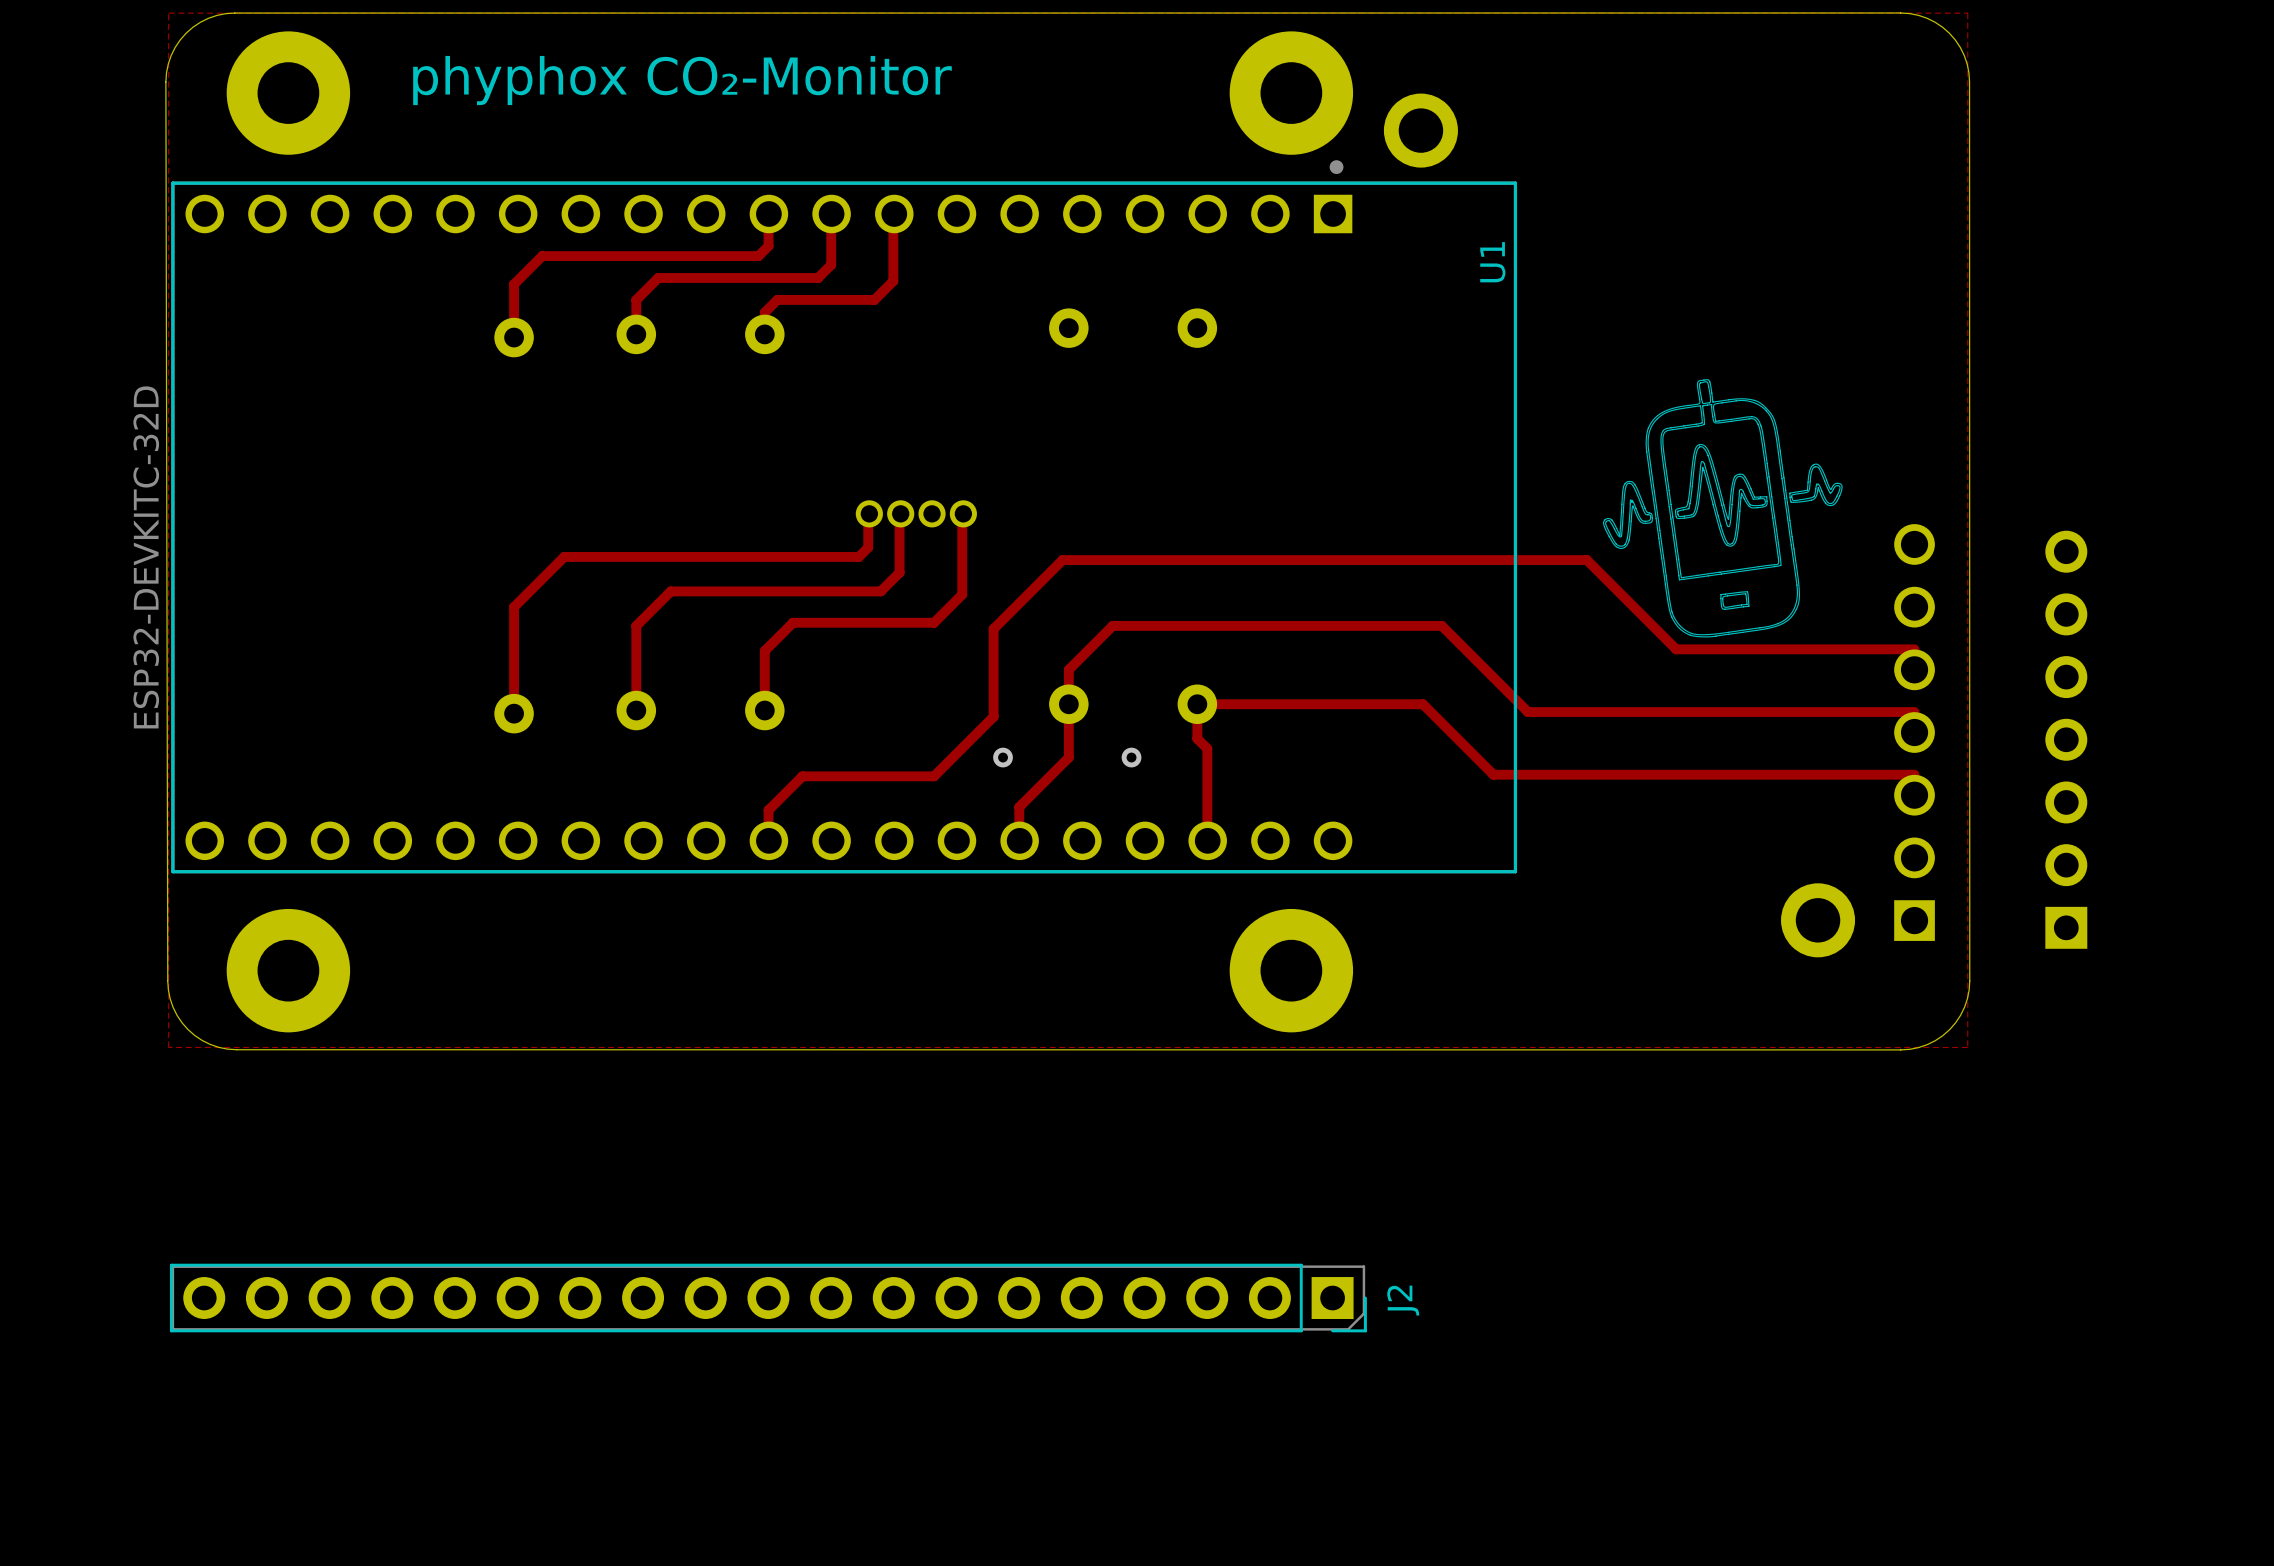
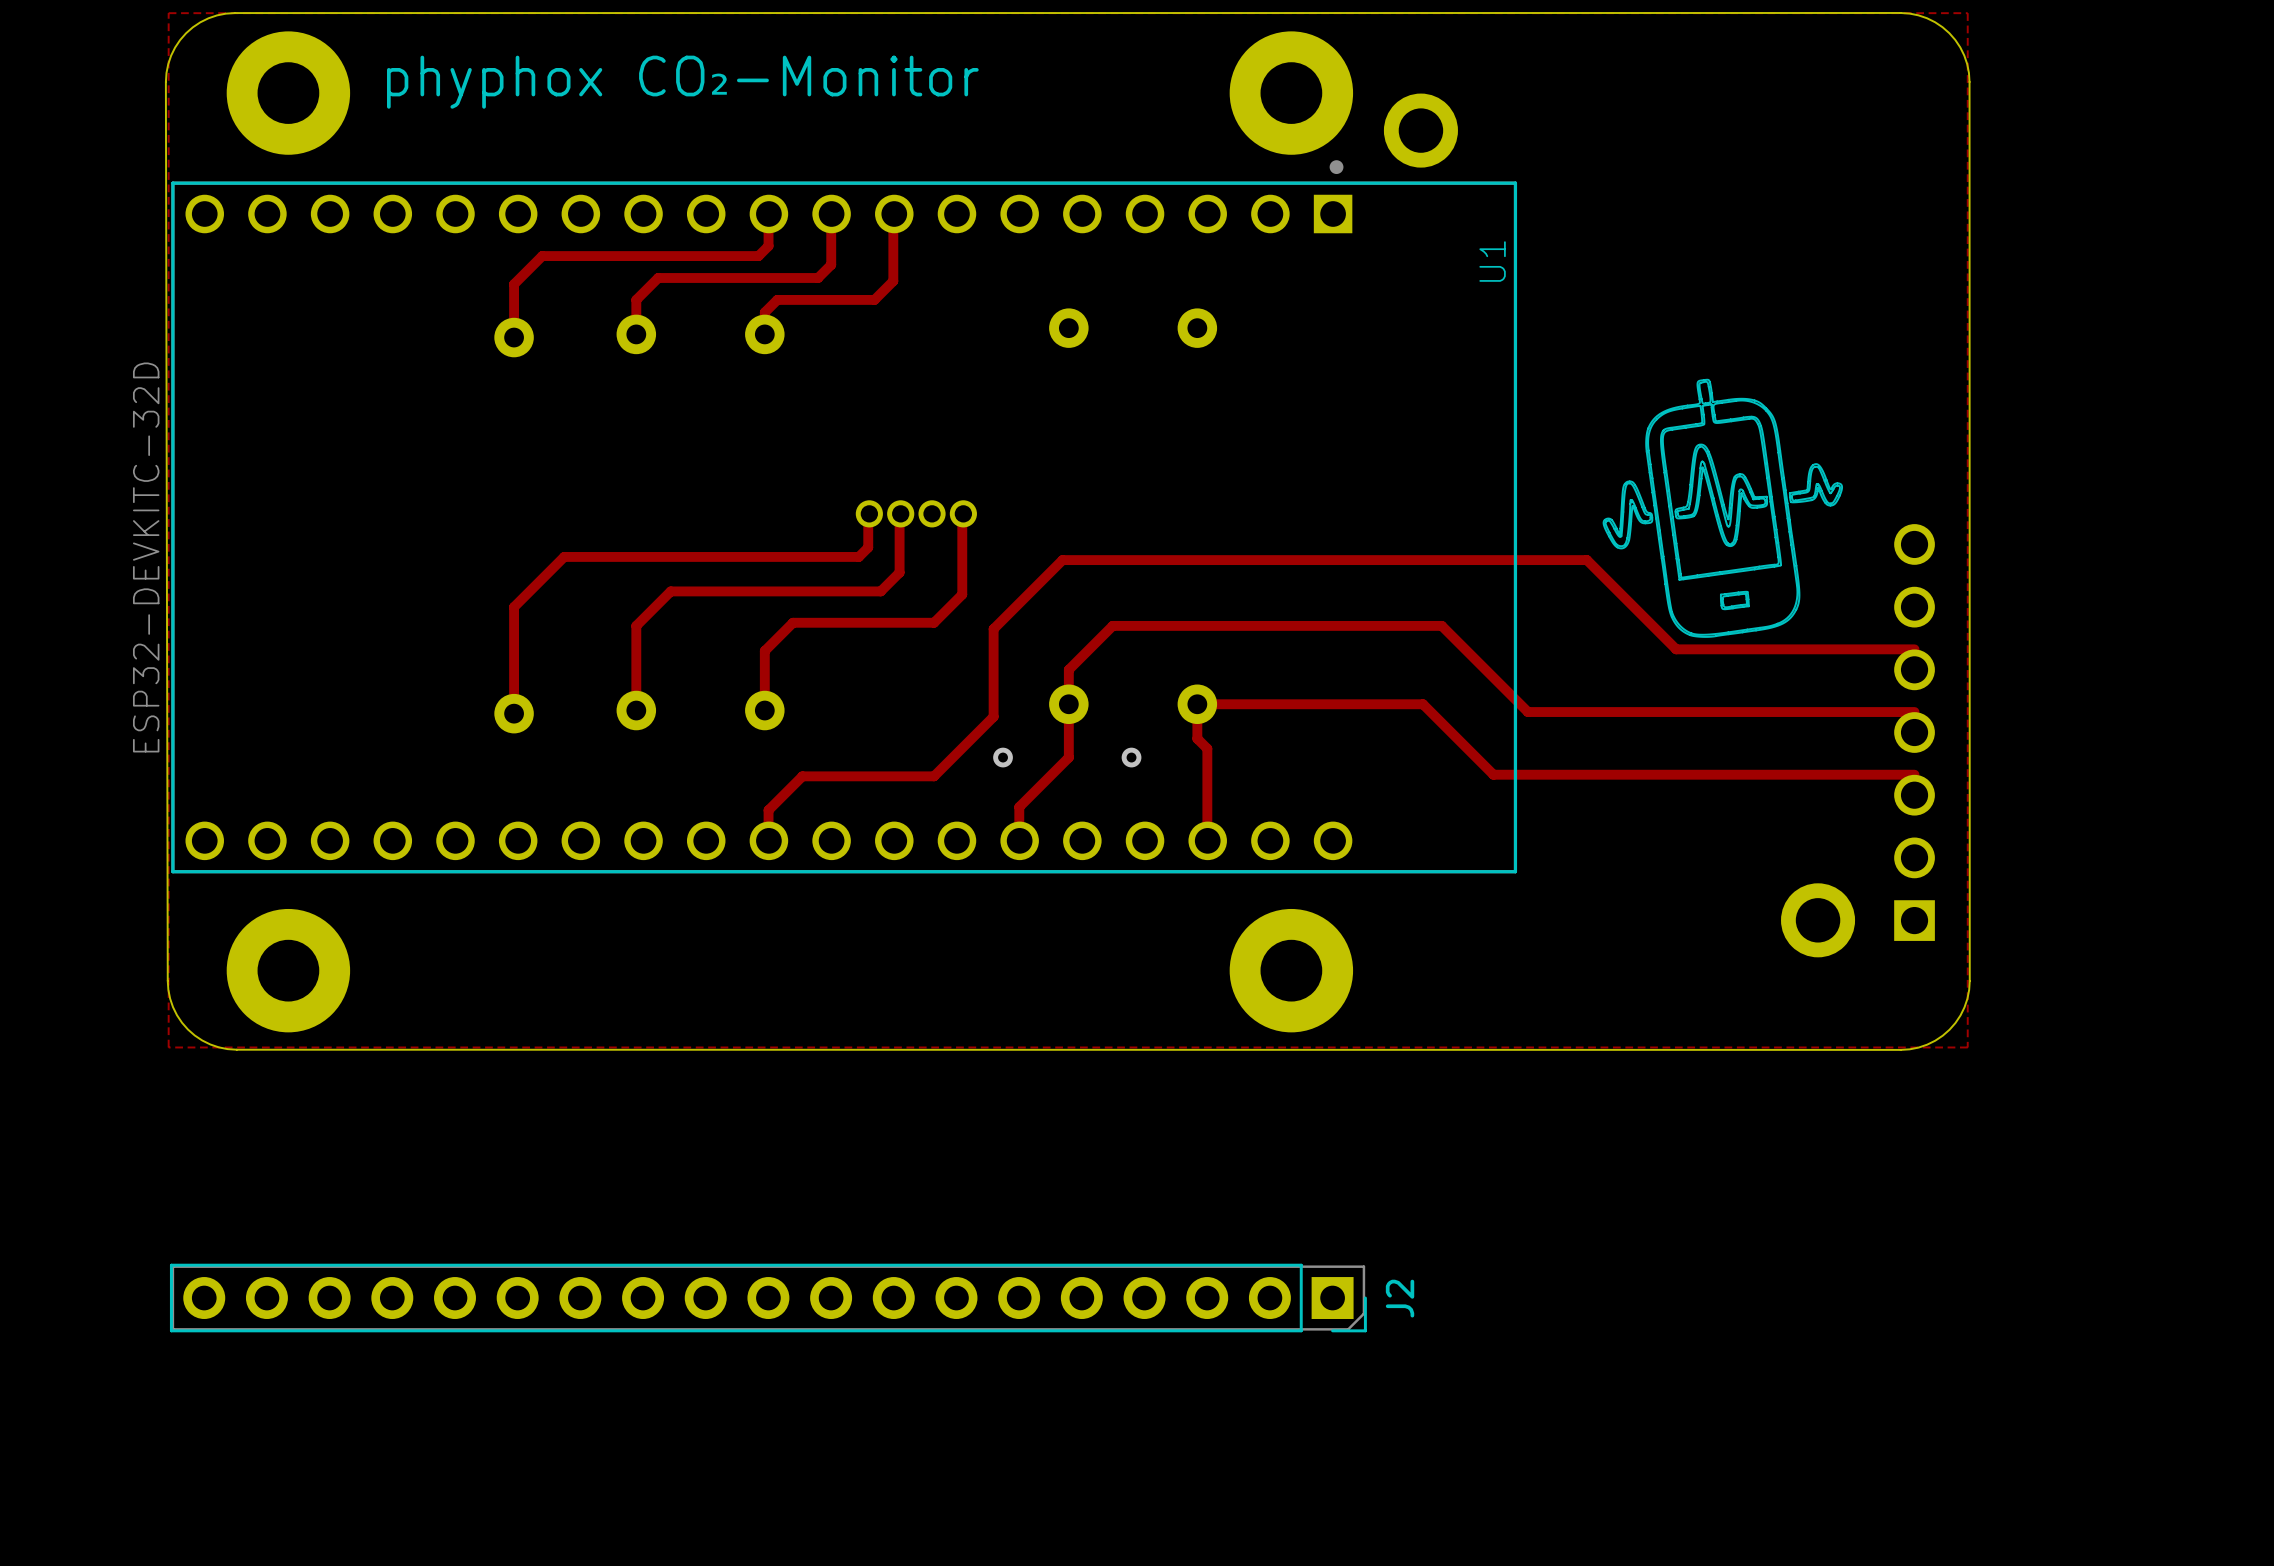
part: (2066, 739) -> none

